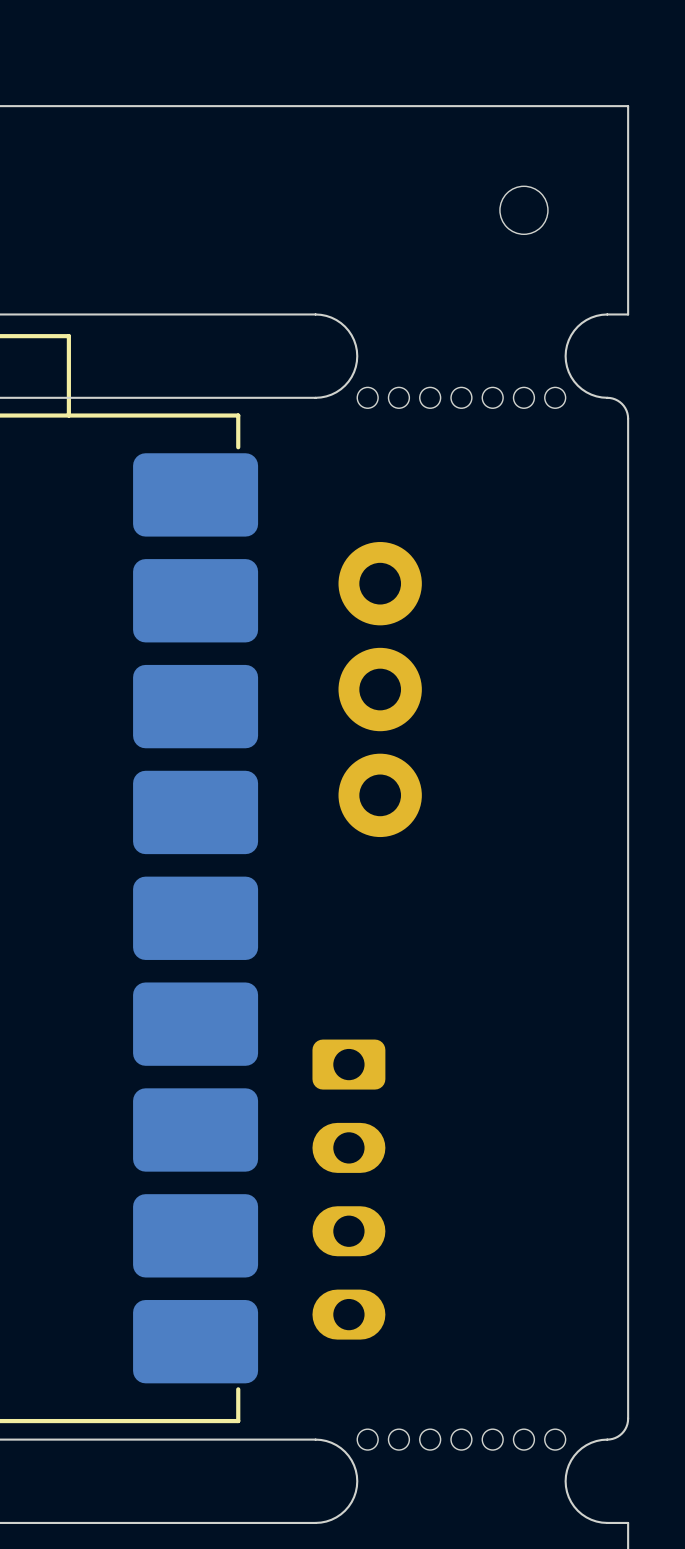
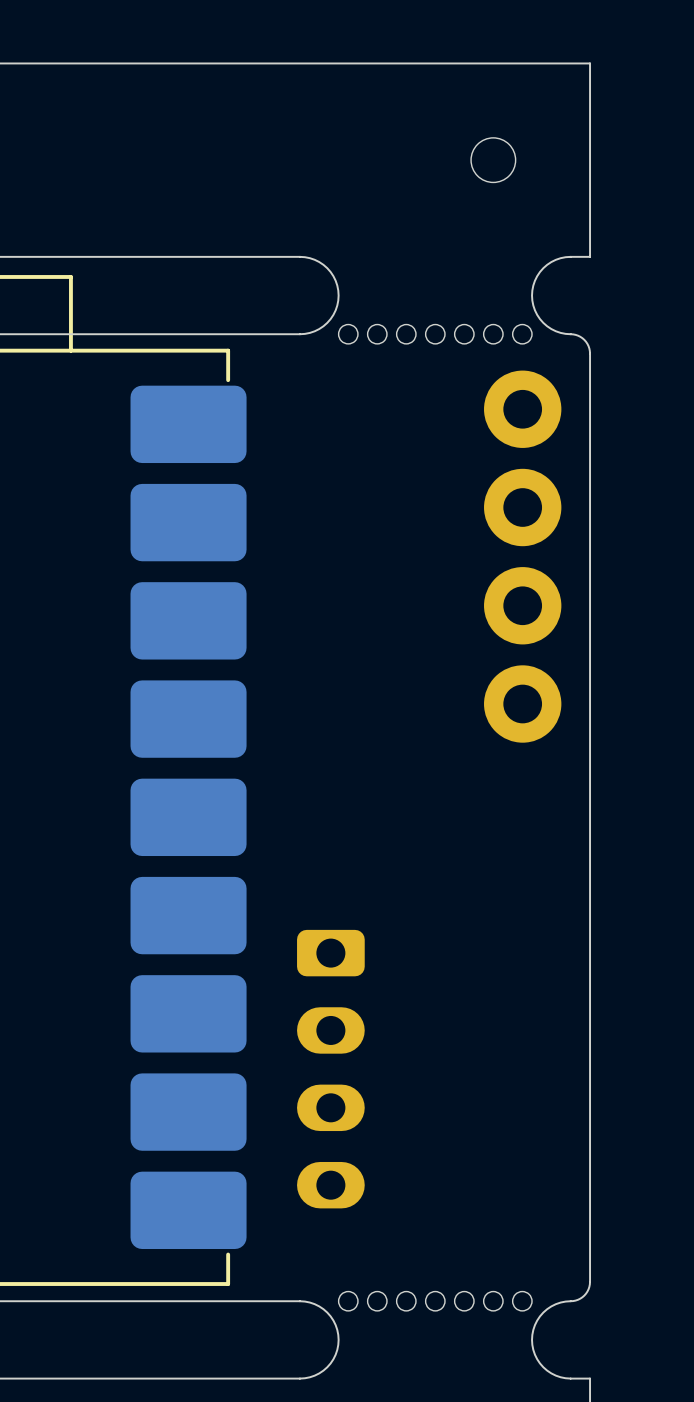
part: none -> (522, 556)
part: (380, 689) -> none

